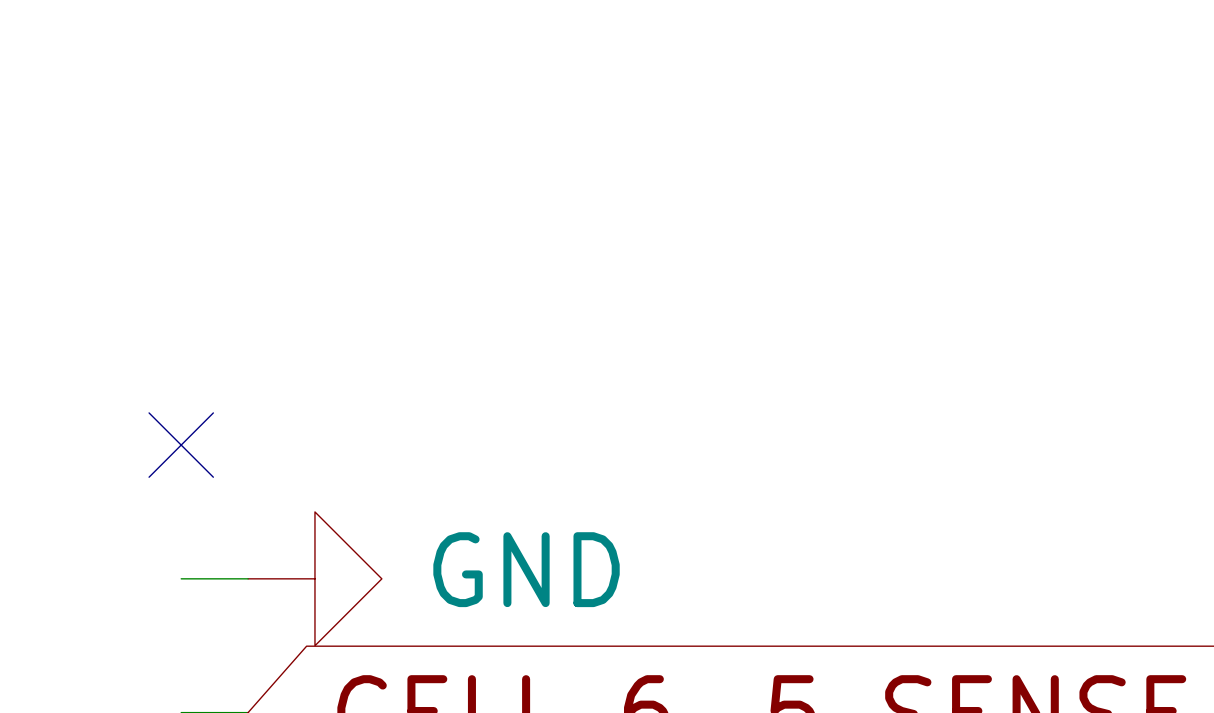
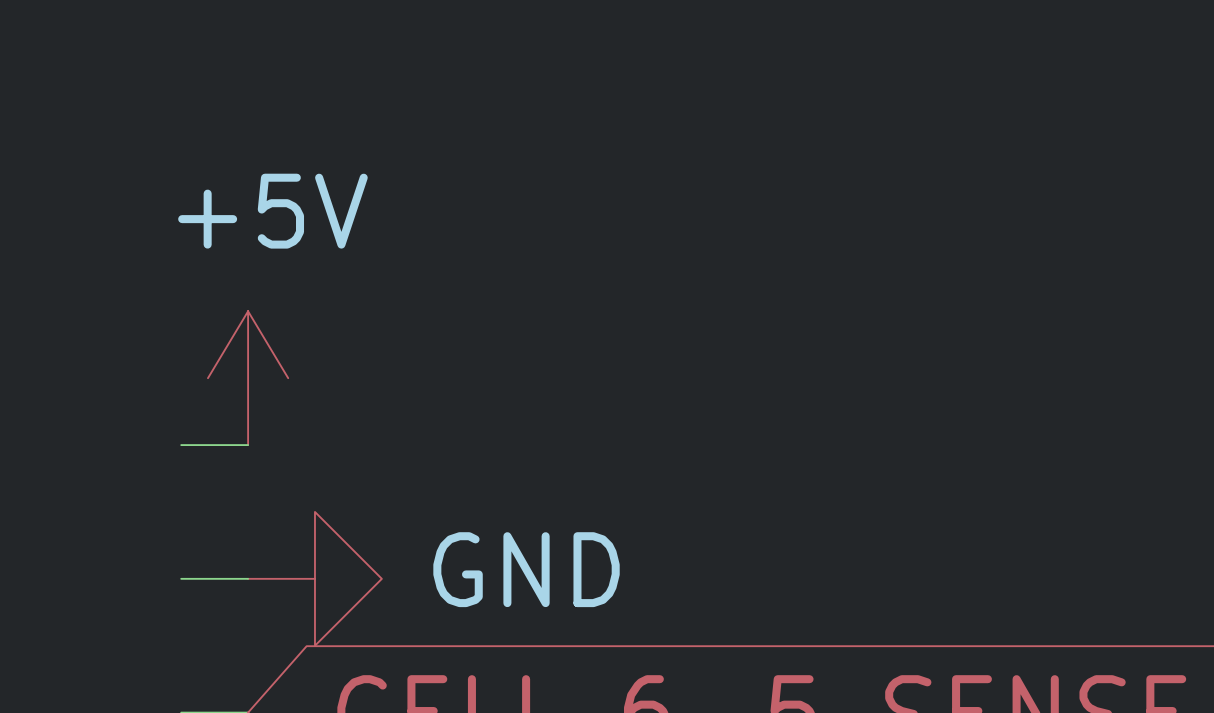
power symbol: none -> +5V (248, 378)
wire: none -> (181, 445) (248, 445)
no-connect mark: (181, 445) -> none

